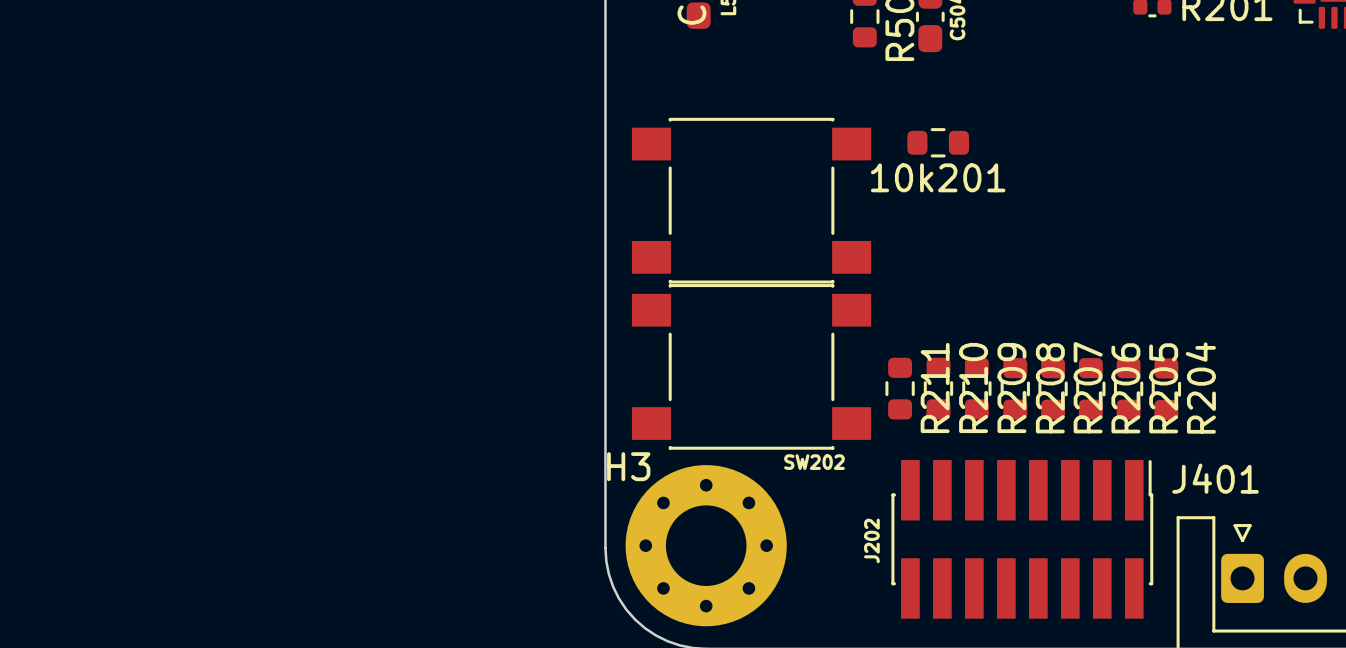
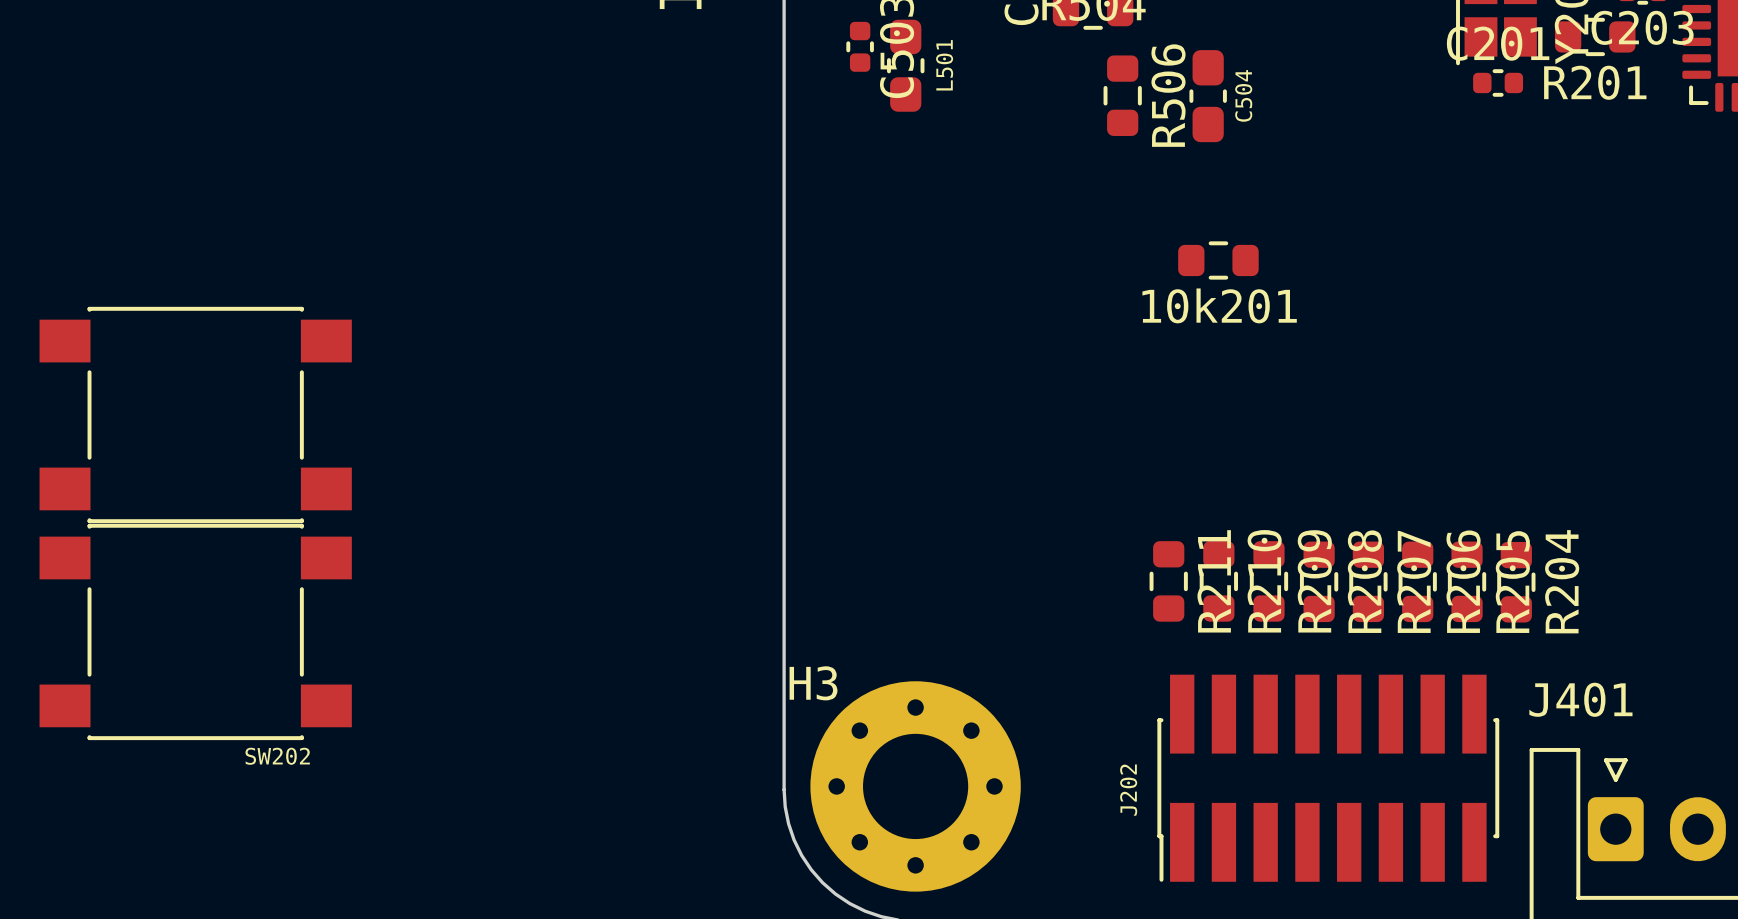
part position: (751, 200) -> (195, 414)
SW202 position: (751, 366) -> (195, 631)
J202 rotation: 0° (1022, 539) -> 180° (1328, 778)

